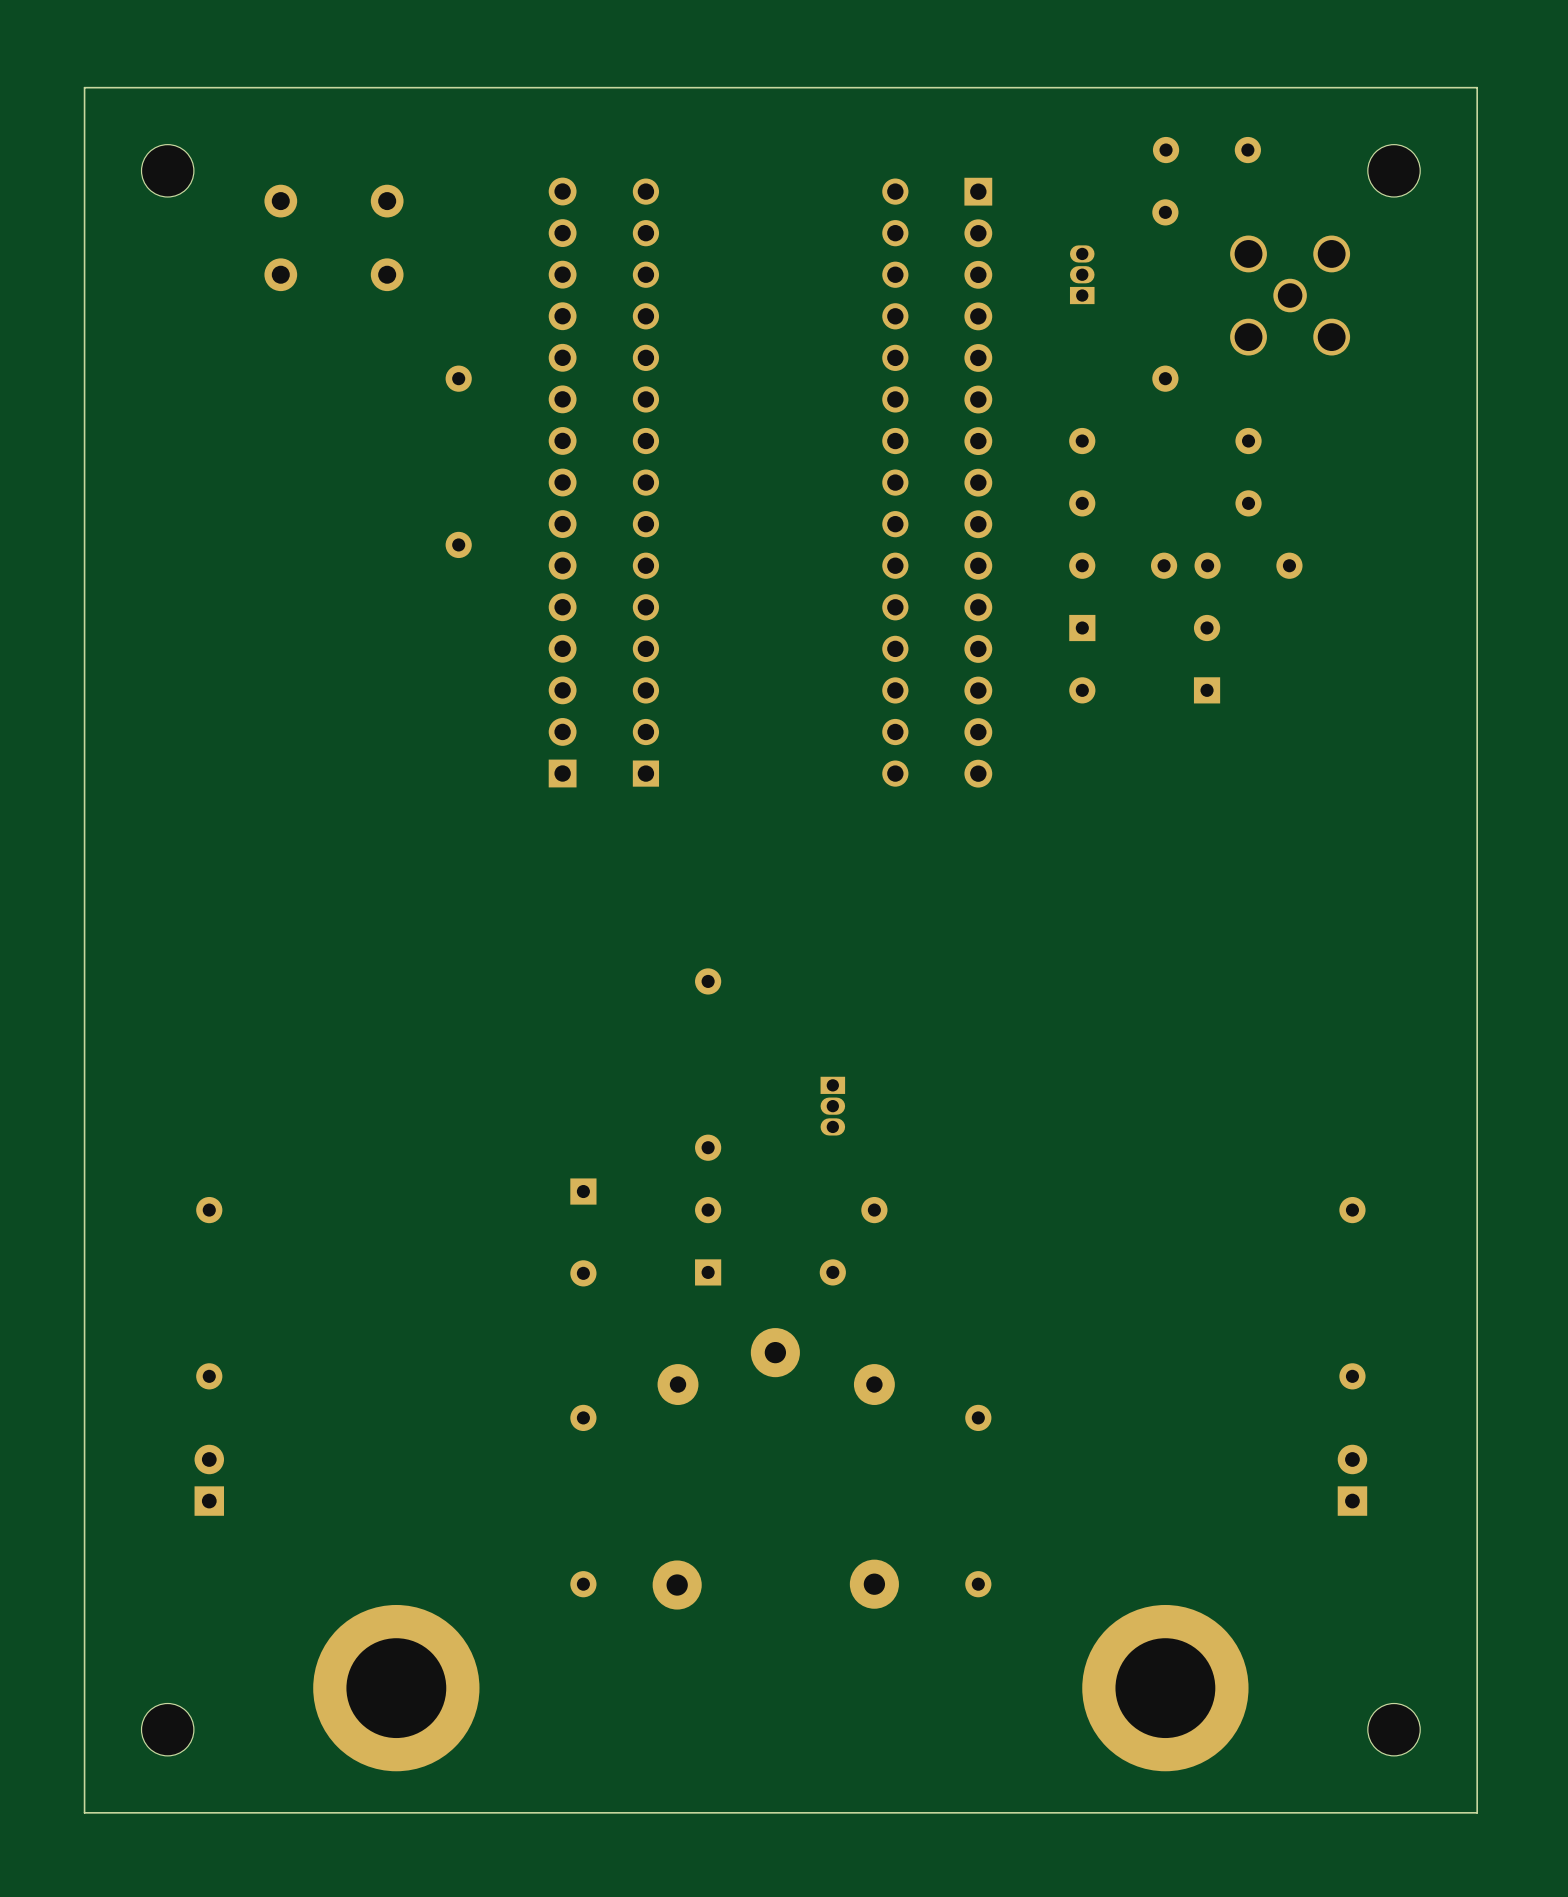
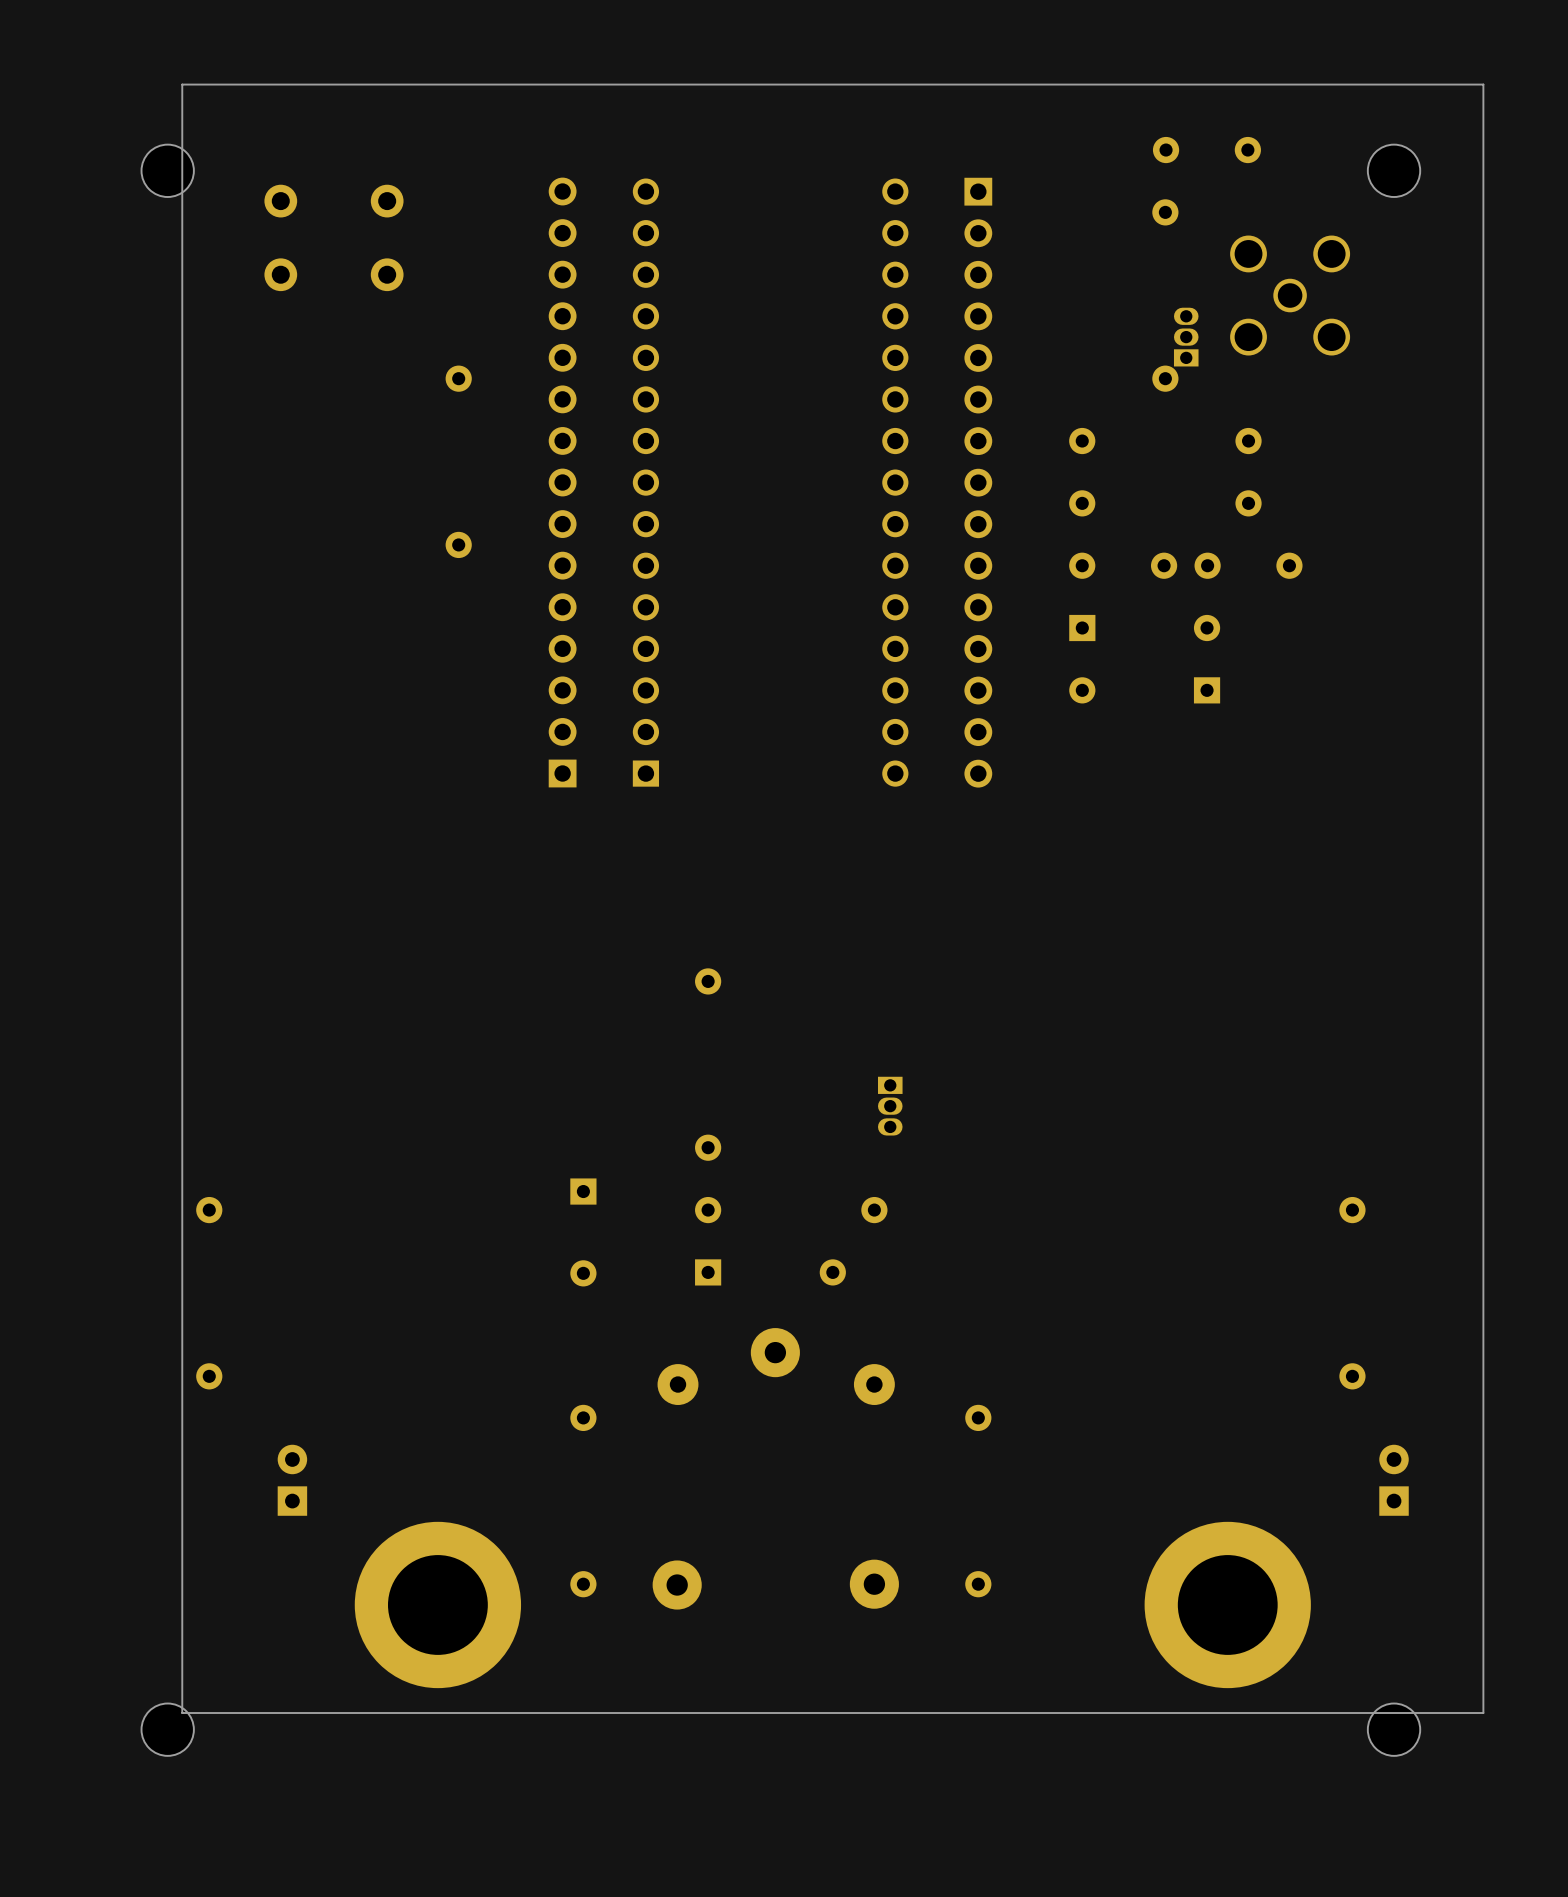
board edge: (1477, 87) (84, 87) (84, 1812) (1477, 1812) (1477, 87) -> (1483, 84) (1483, 1713) (182, 1713) (182, 84) (1483, 84)
part position: (1082, 274) -> (1186, 337)
part position: (832, 1106) -> (890, 1106)
part position: (209, 1480) -> (292, 1480)
part position: (1352, 1480) -> (1394, 1480)
part position: (396, 1688) -> (437, 1604)
part position: (1165, 1688) -> (1227, 1604)

